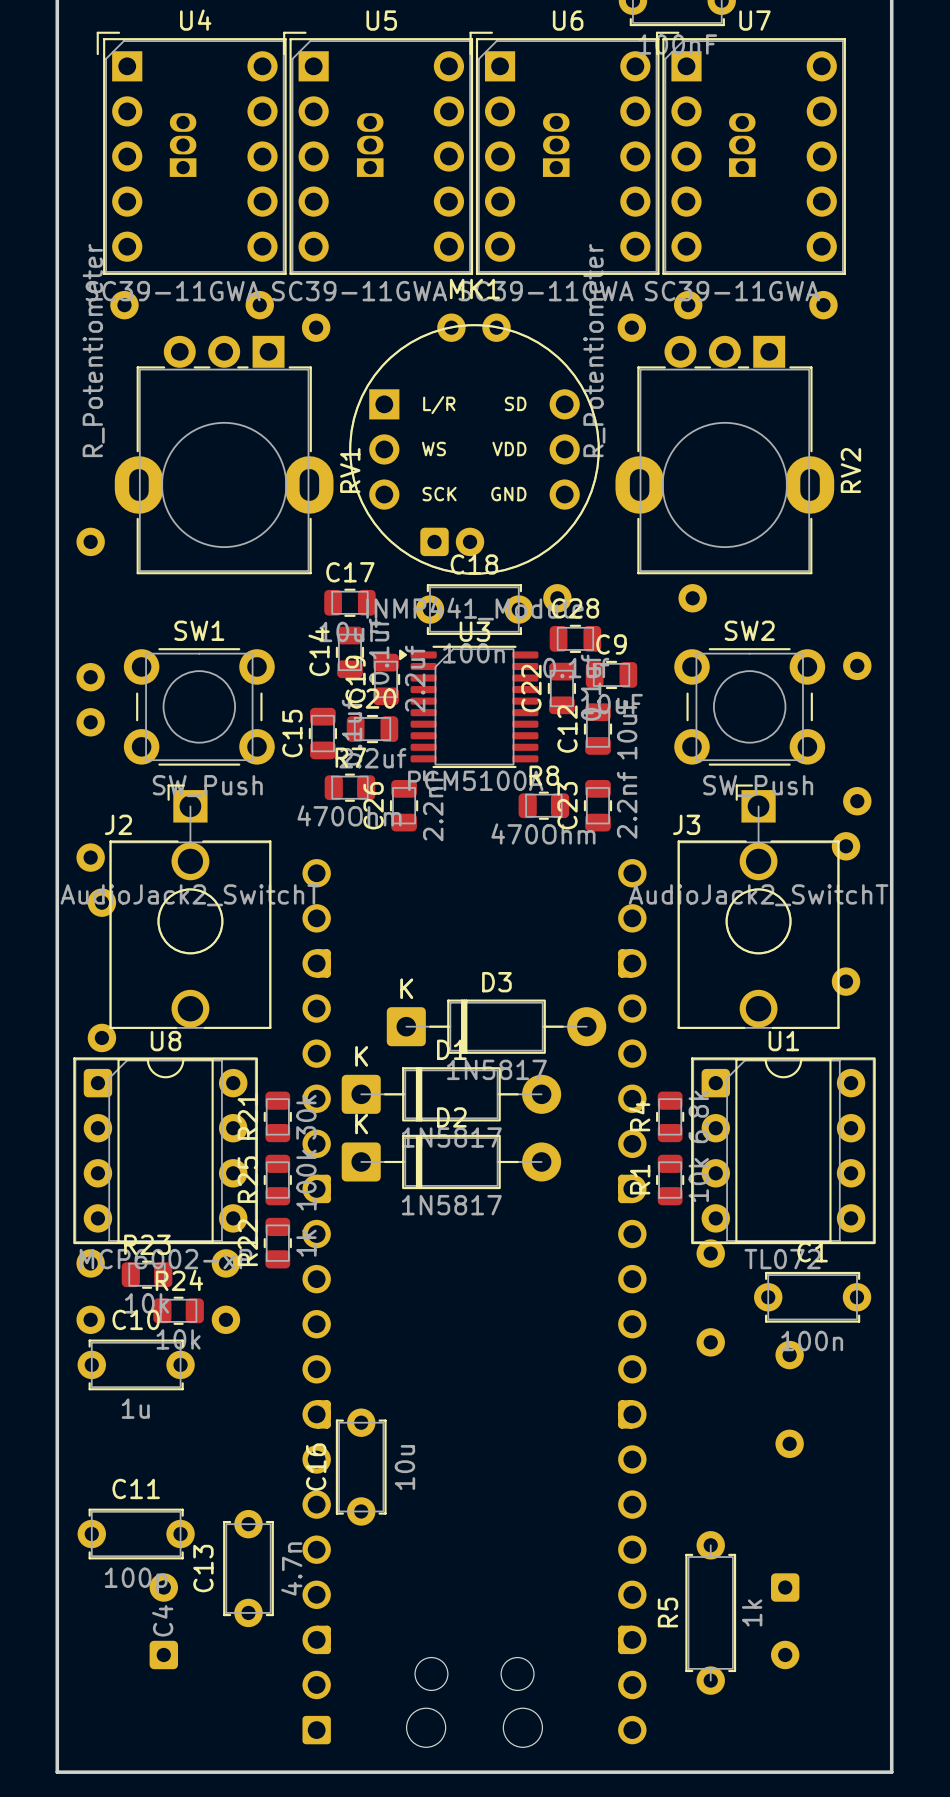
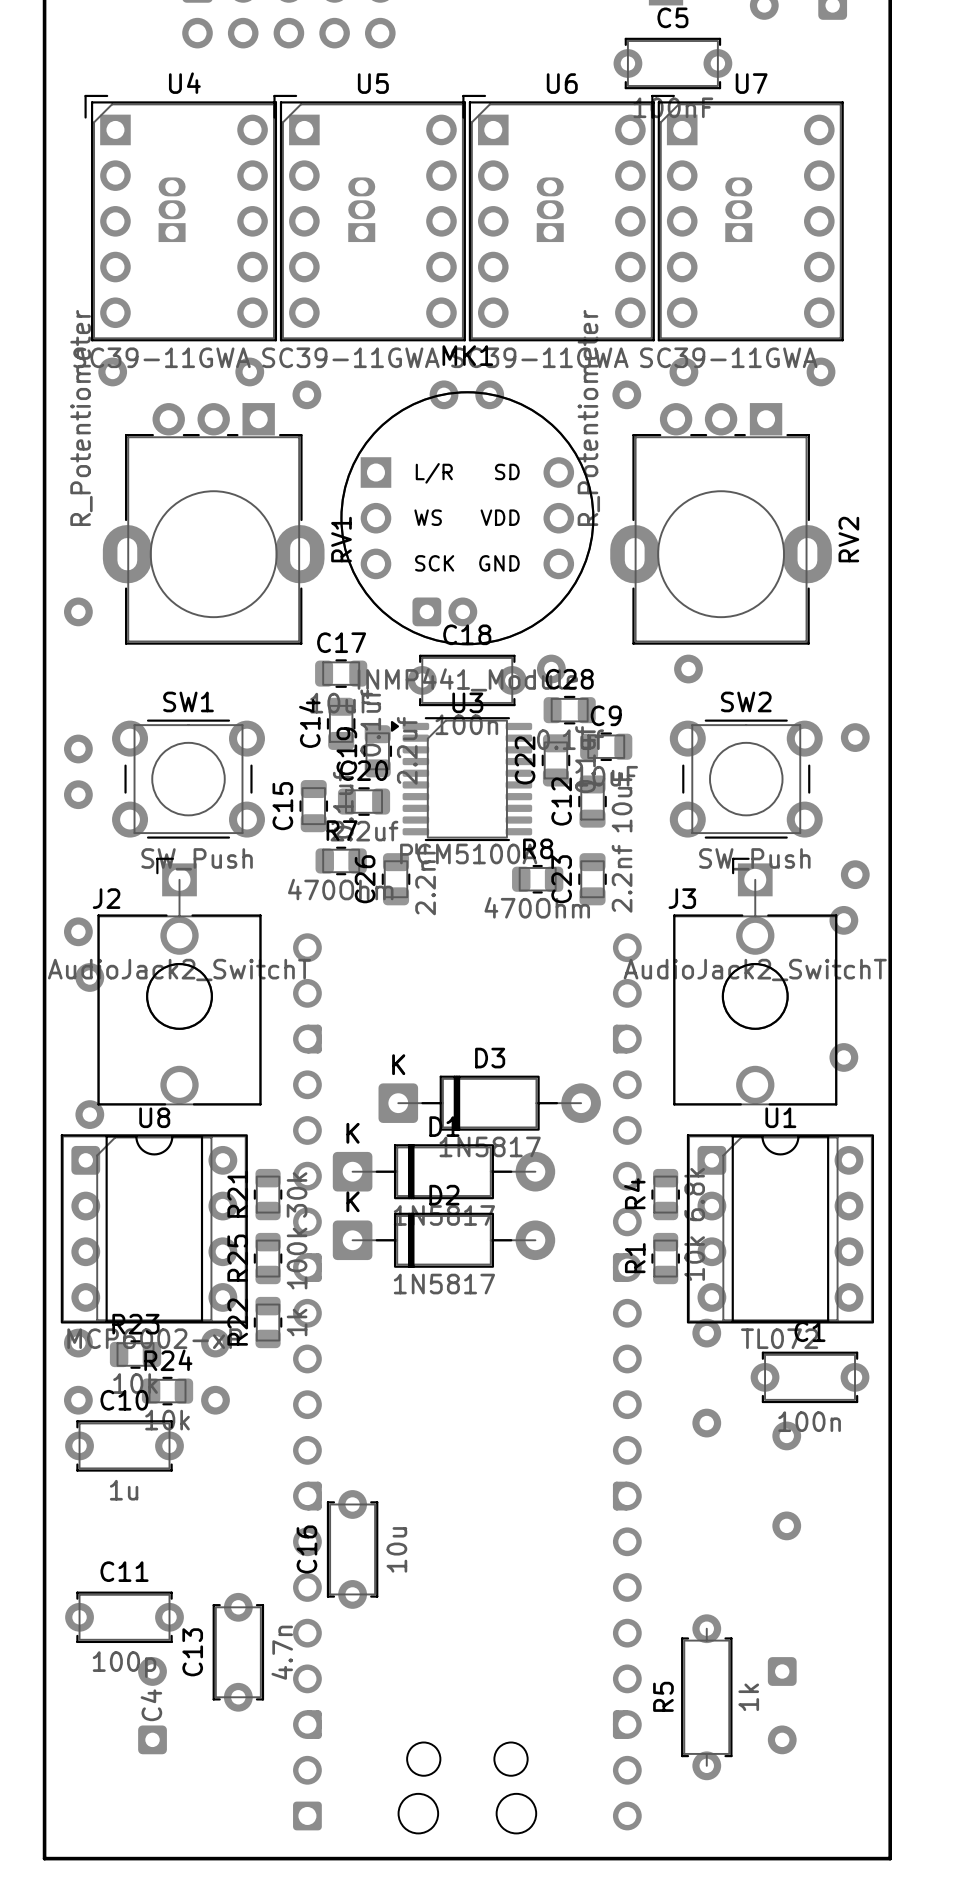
MK1 footprint: [349, 324, 600, 575] -> [340, 391, 595, 646]

